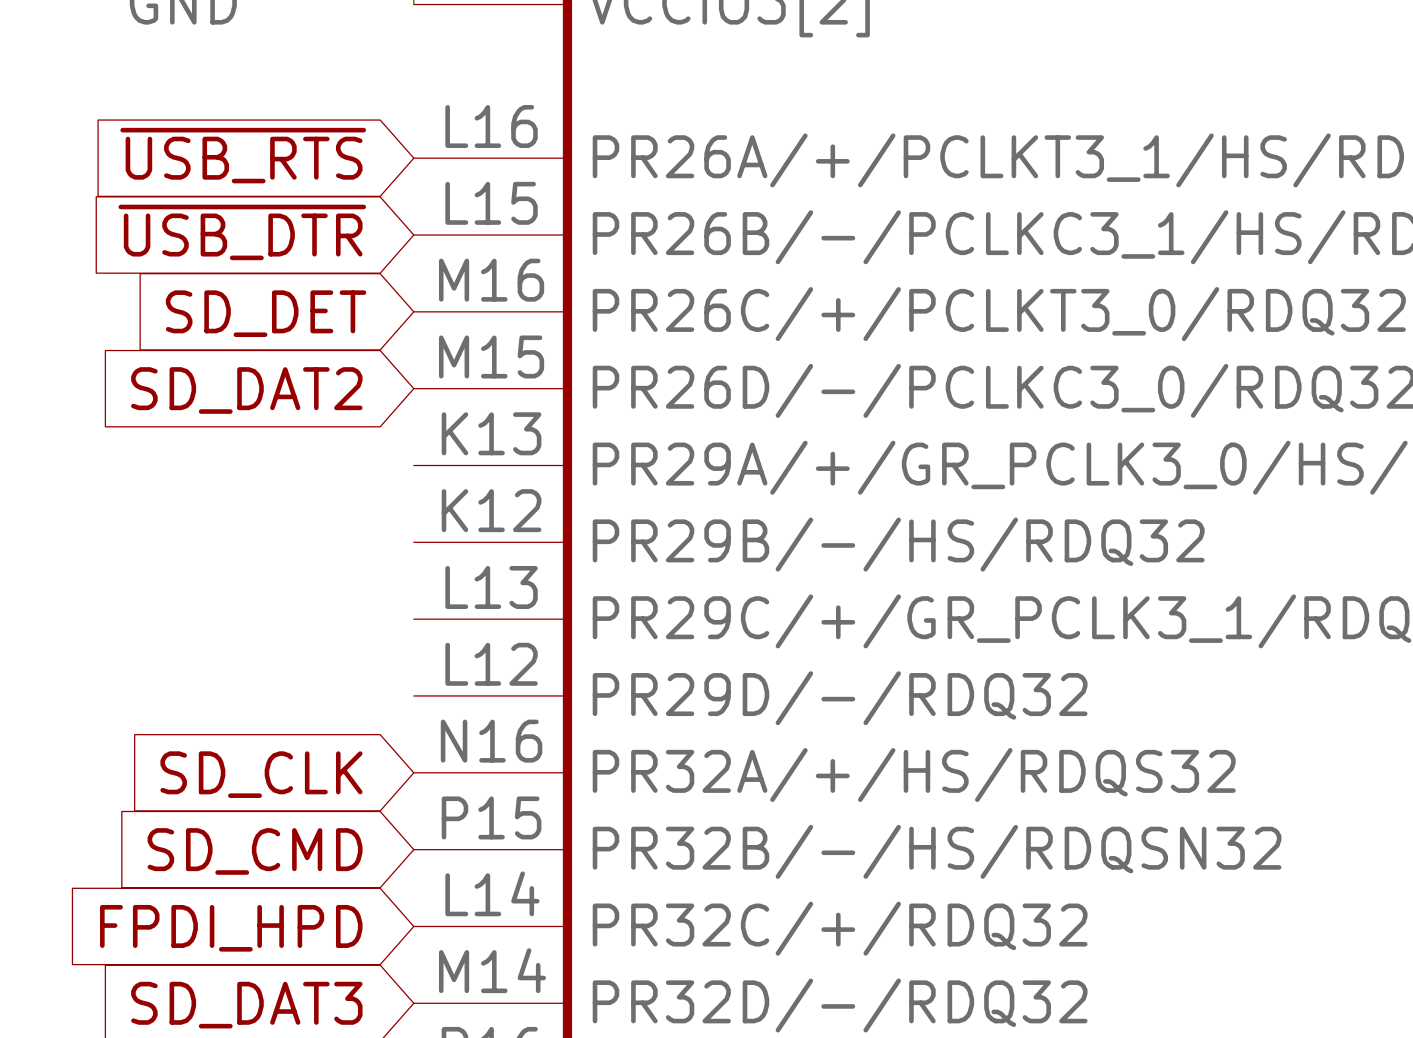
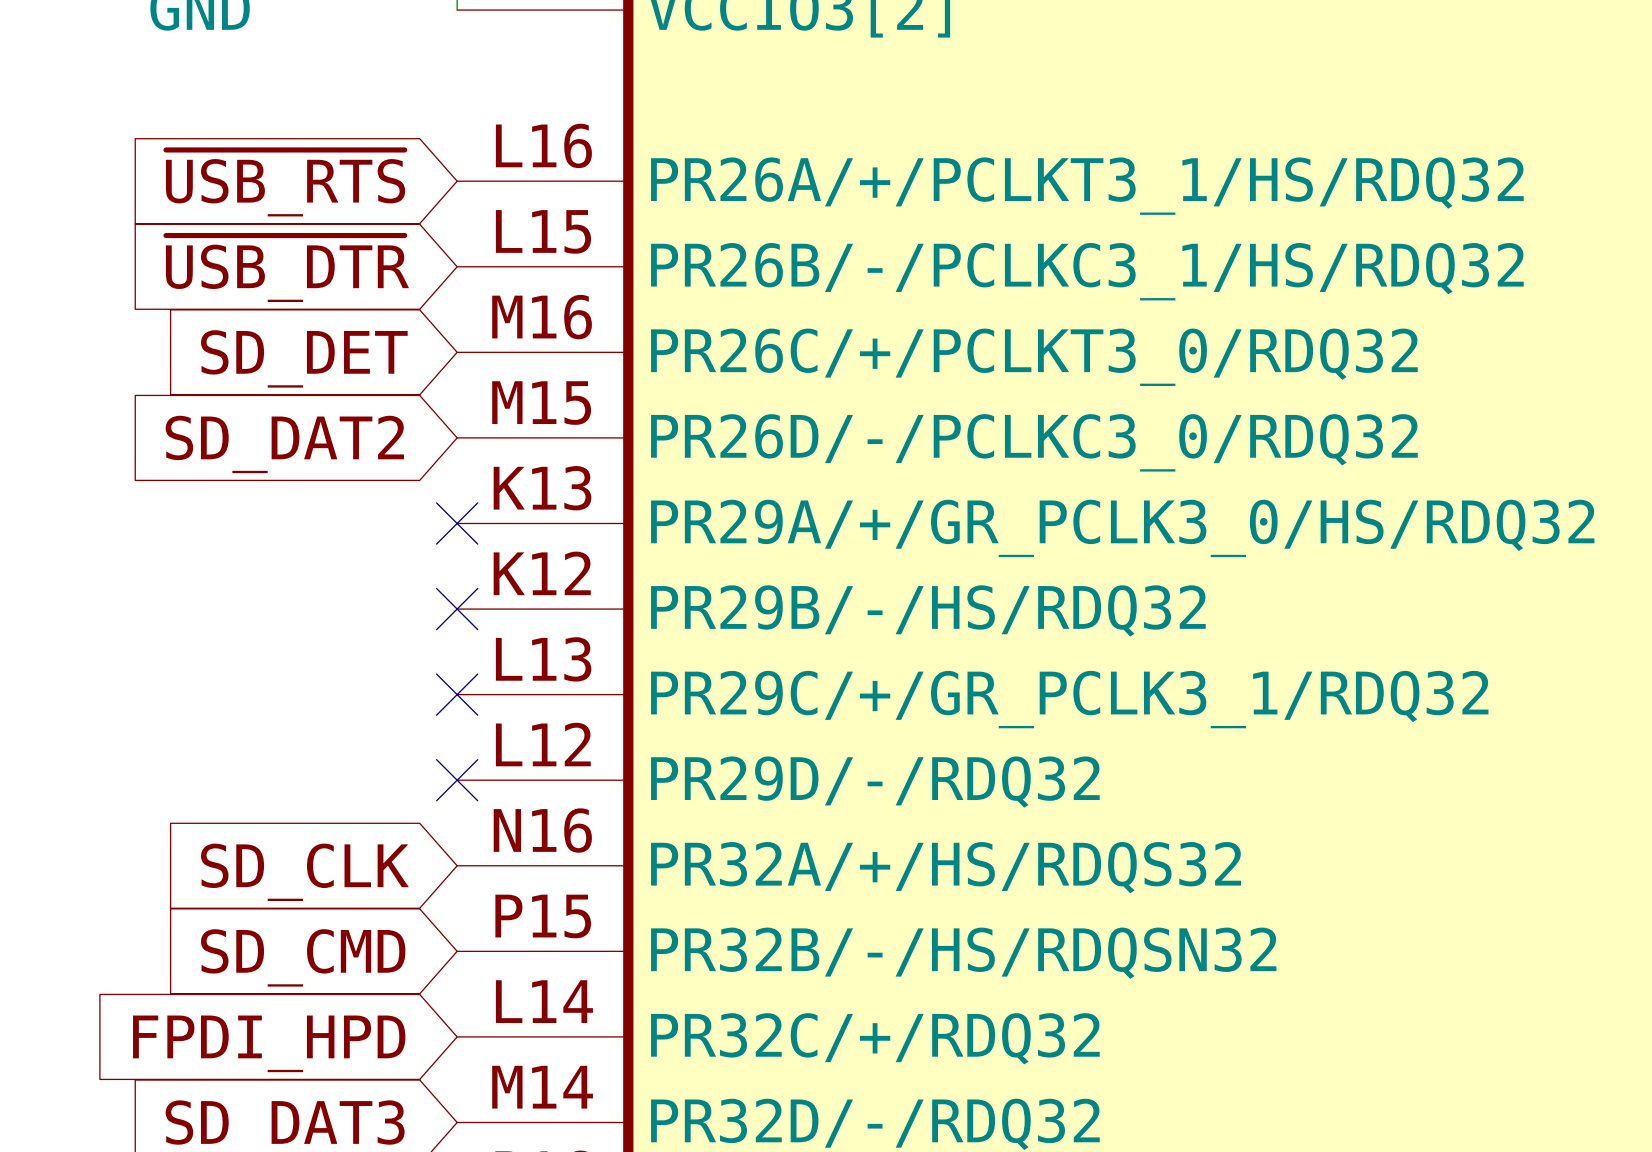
no-connect mark: none -> (457, 523)
no-connect mark: none -> (457, 609)
no-connect mark: none -> (457, 694)
no-connect mark: none -> (457, 780)

